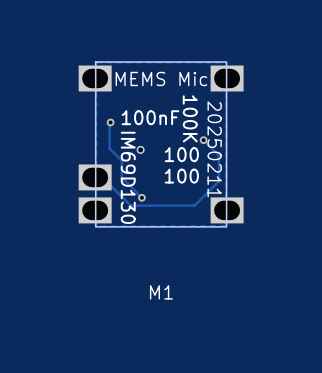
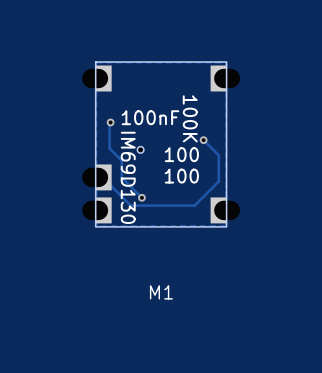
M1 footprint: [78, 61, 244, 228] -> [82, 61, 241, 228]
text: MEMS Mic (161, 78) -> none
text: 20250211 (214, 149) -> none

